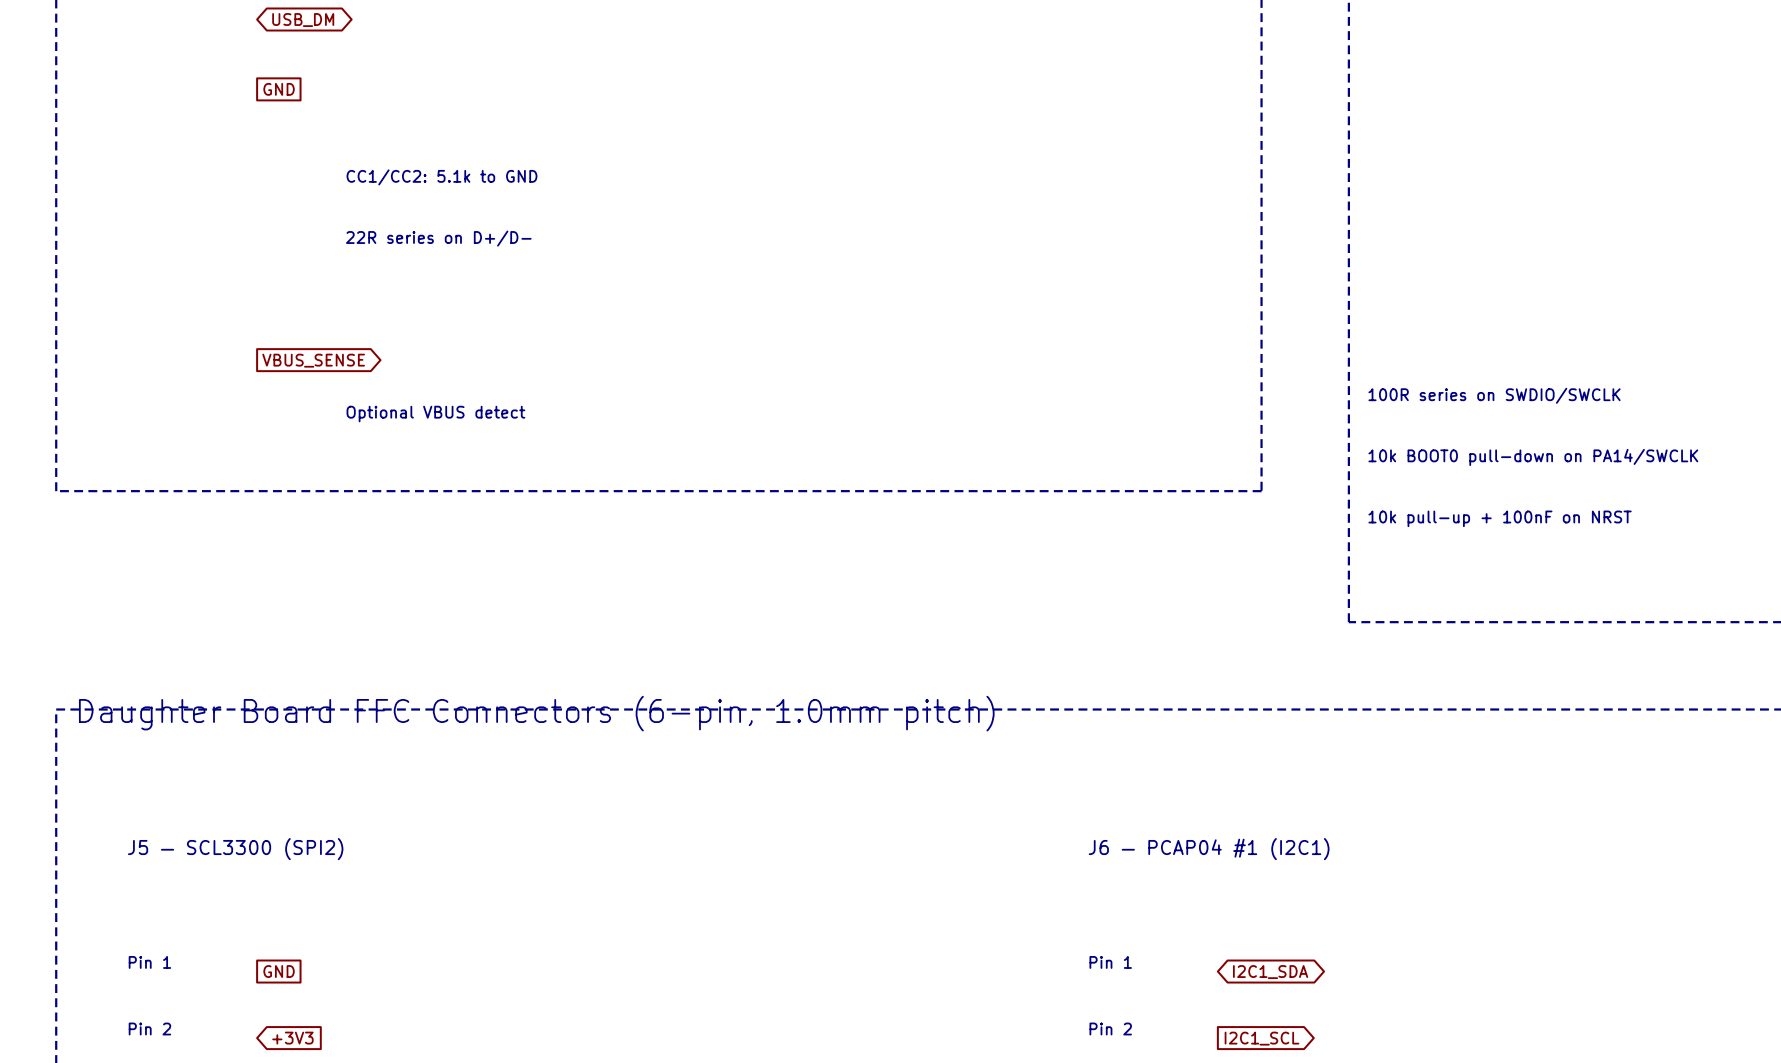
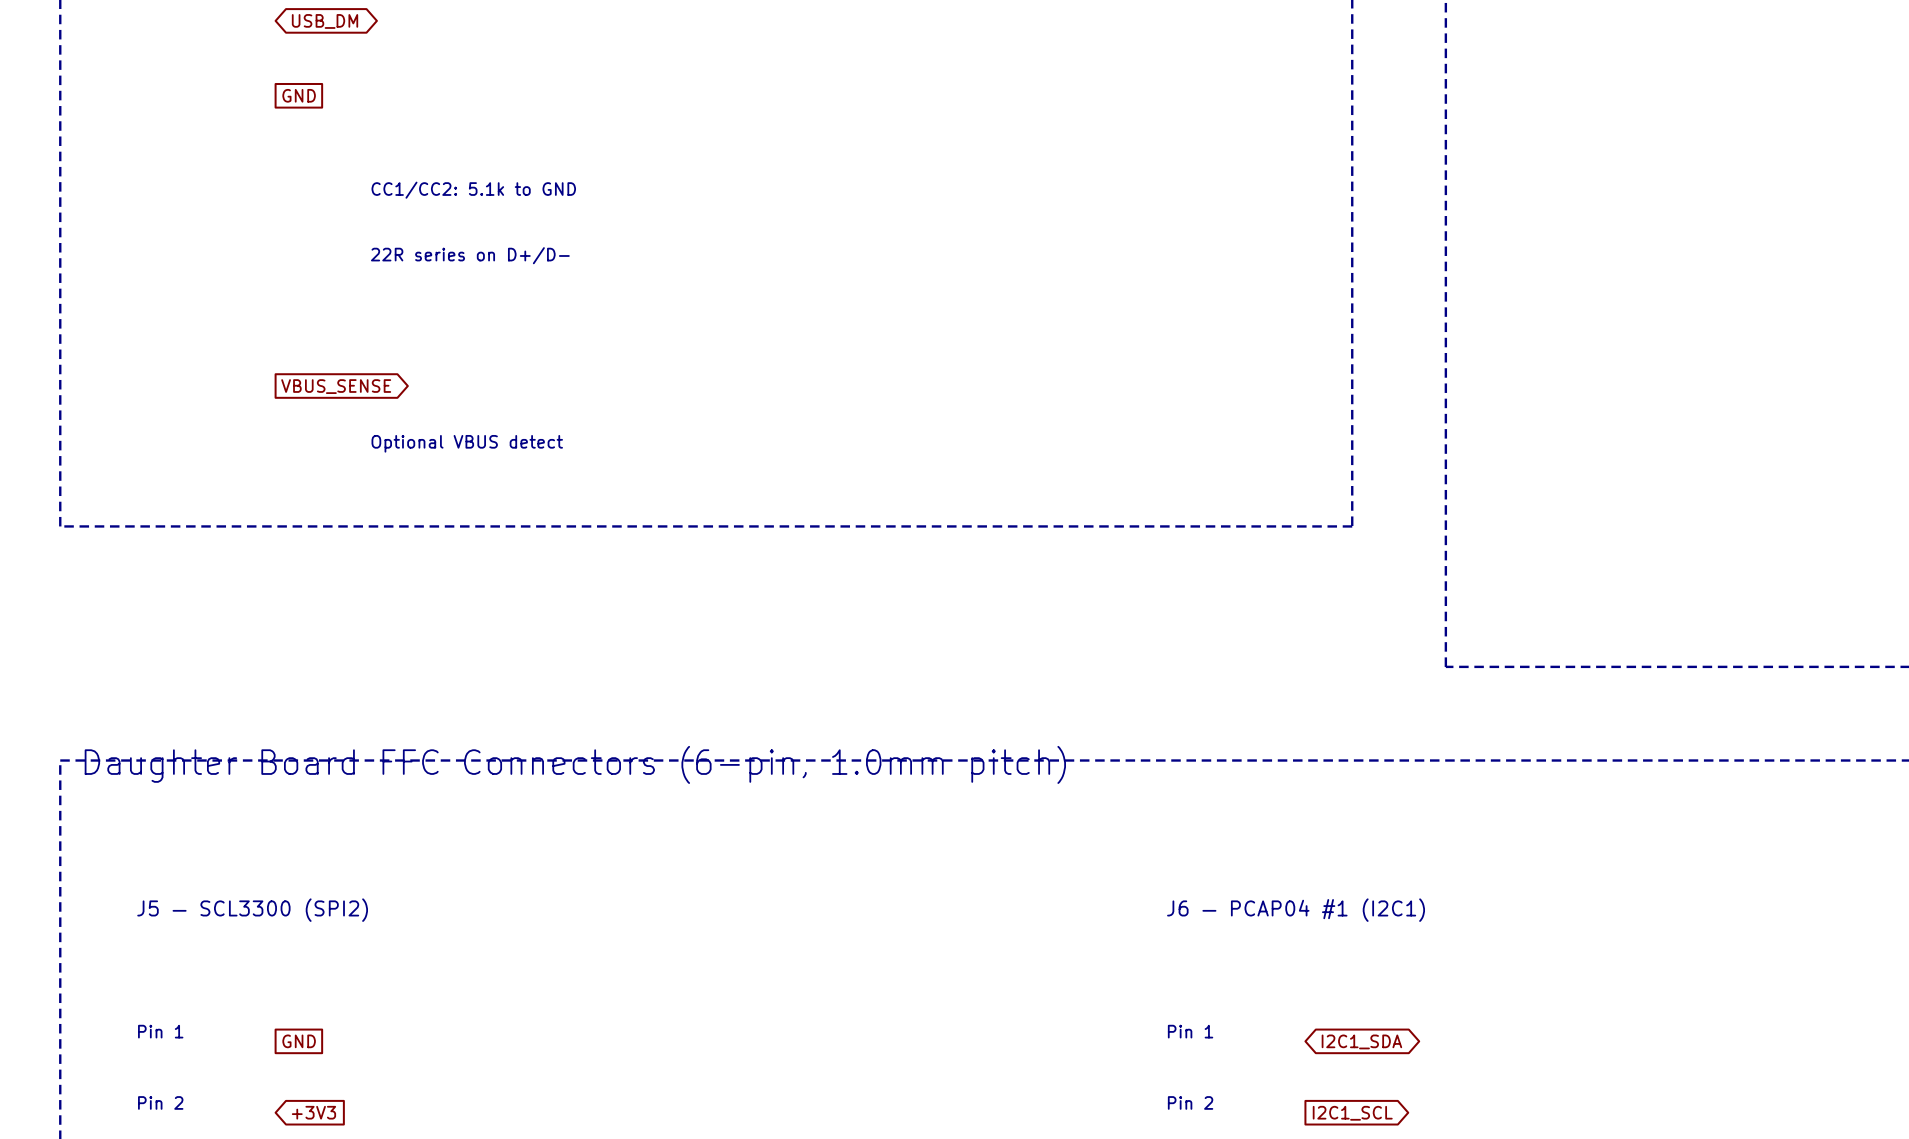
text: 100R series on SWDIO/SWCLK (1494, 395) -> none
text: 10k BOOT0 pull-down on PA14/SWCLK (1533, 457) -> none
text: 10k pull-up + 100nF on NRST (1500, 518) -> none

